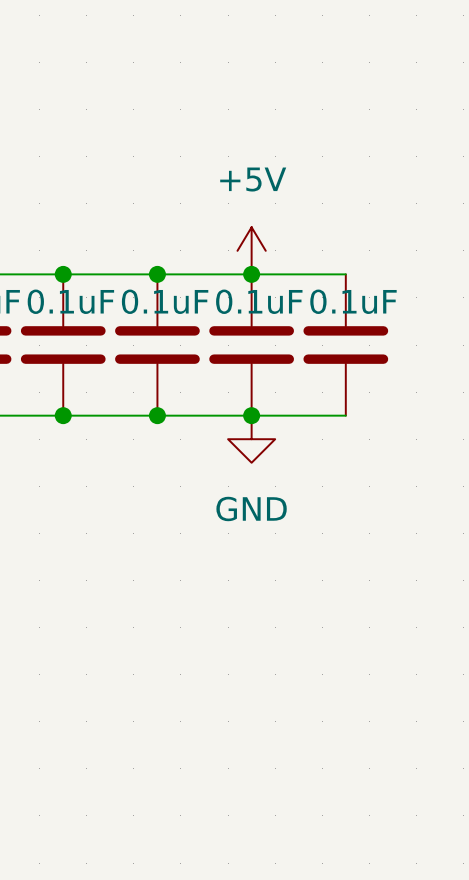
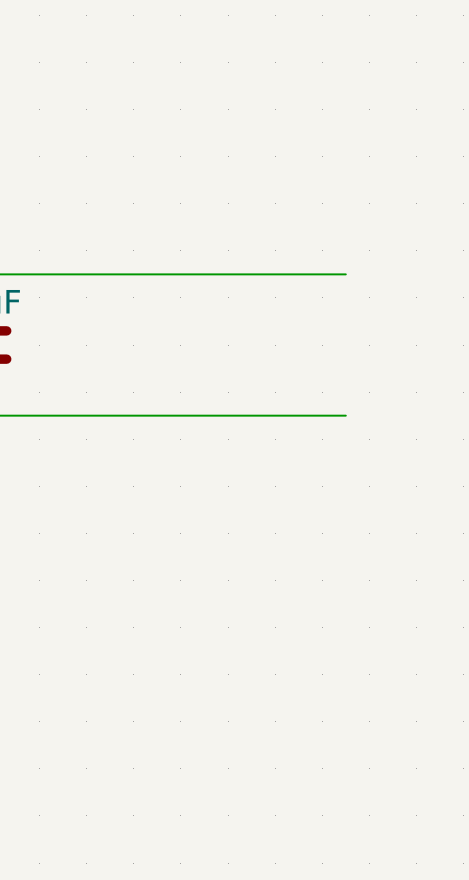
power symbol: +5V (251, 250) -> none
junction: (63, 274) -> none
junction: (157, 274) -> none
junction: (251, 274) -> none
part: 0.1uF (63, 345) -> none
part: 0.1uF (157, 345) -> none
part: 0.1uF (251, 345) -> none
part: 0.1uF (345, 345) -> none
junction: (63, 415) -> none
junction: (157, 415) -> none
junction: (251, 415) -> none
power symbol: GND (251, 439) -> none

